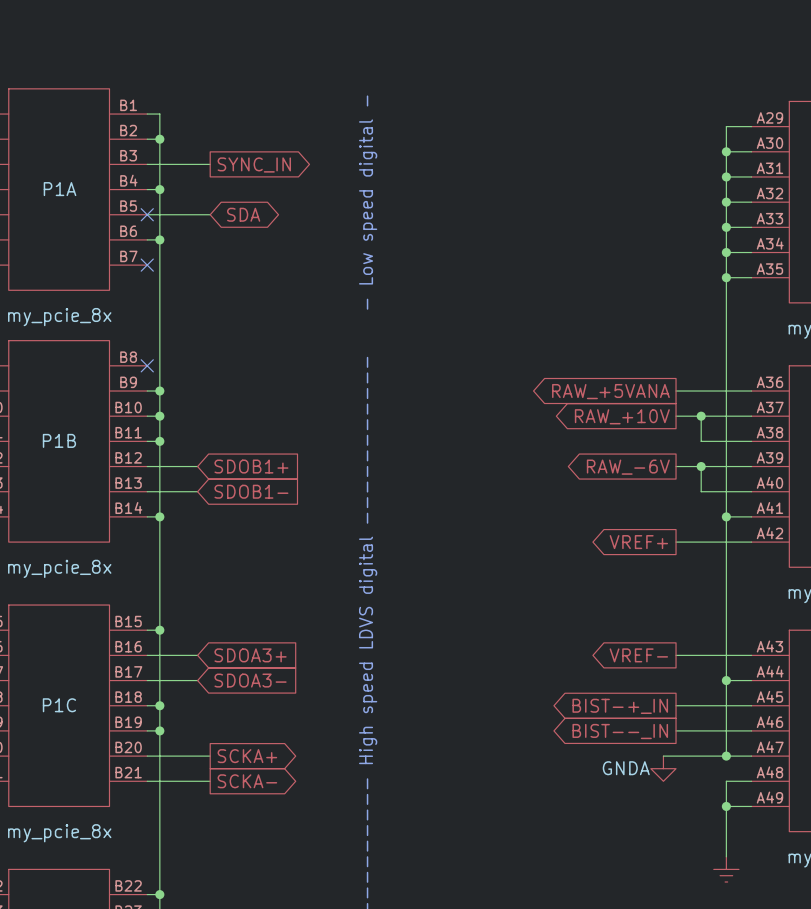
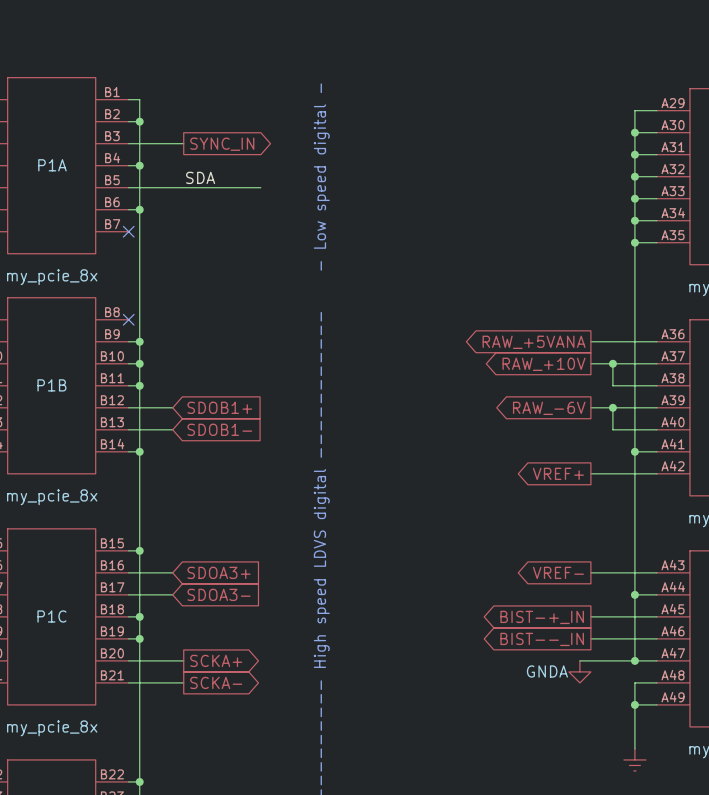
label: none -> SDA (200, 177)
no-connect mark: (147, 214) -> none
wire: none -> (183, 187) (260, 187)
global label: SDA (243, 214) -> none

